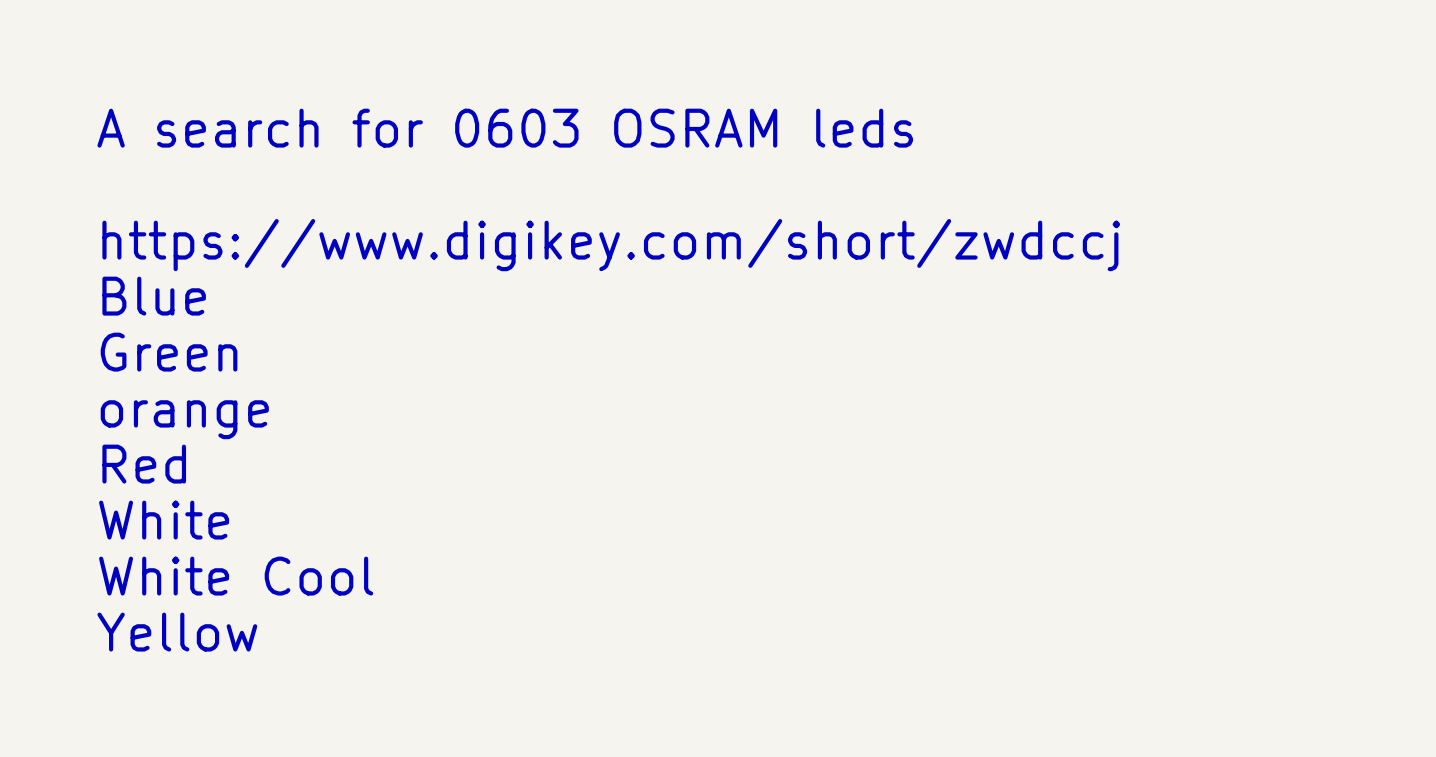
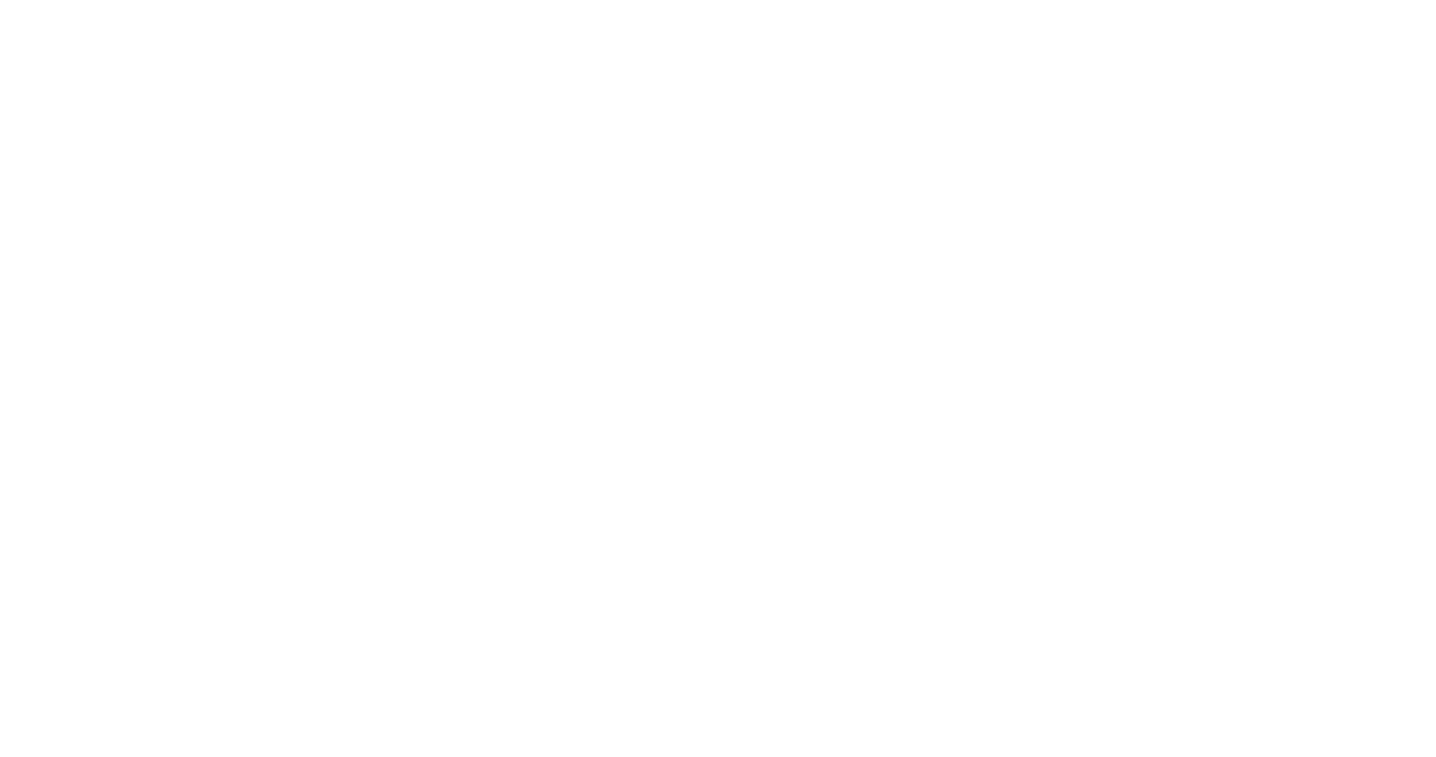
text: A search for 0603 OSRAM leds (505, 128) -> none
text: https://www.digikey.com/short/zwdccj (611, 245) -> none
text: Blue (154, 296) -> none
text: Green (169, 352) -> none
text: orange (184, 419) -> none
text: Red (144, 464) -> none
text: White (164, 520) -> none
text: White Cool (236, 576) -> none
text: Yellow (177, 632) -> none

